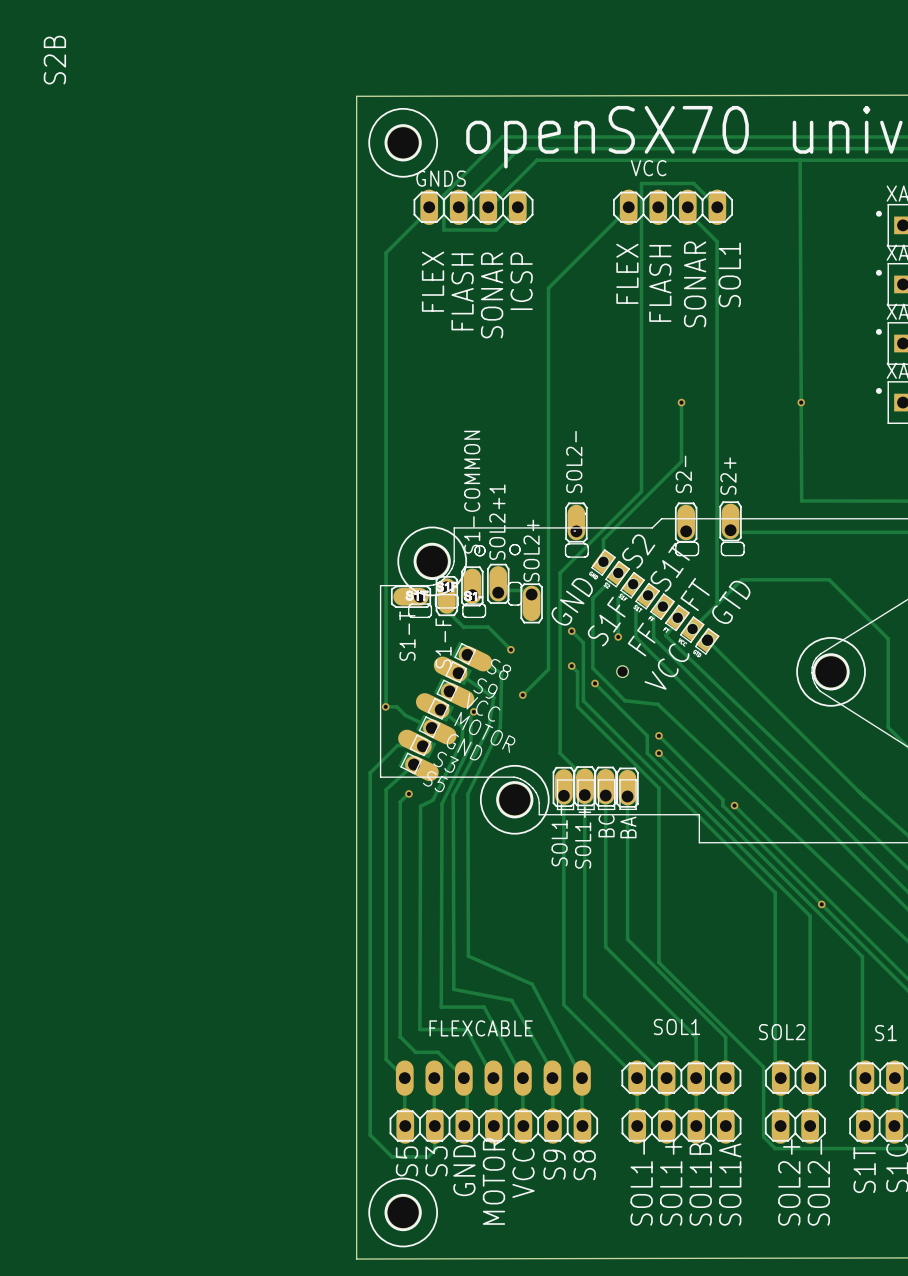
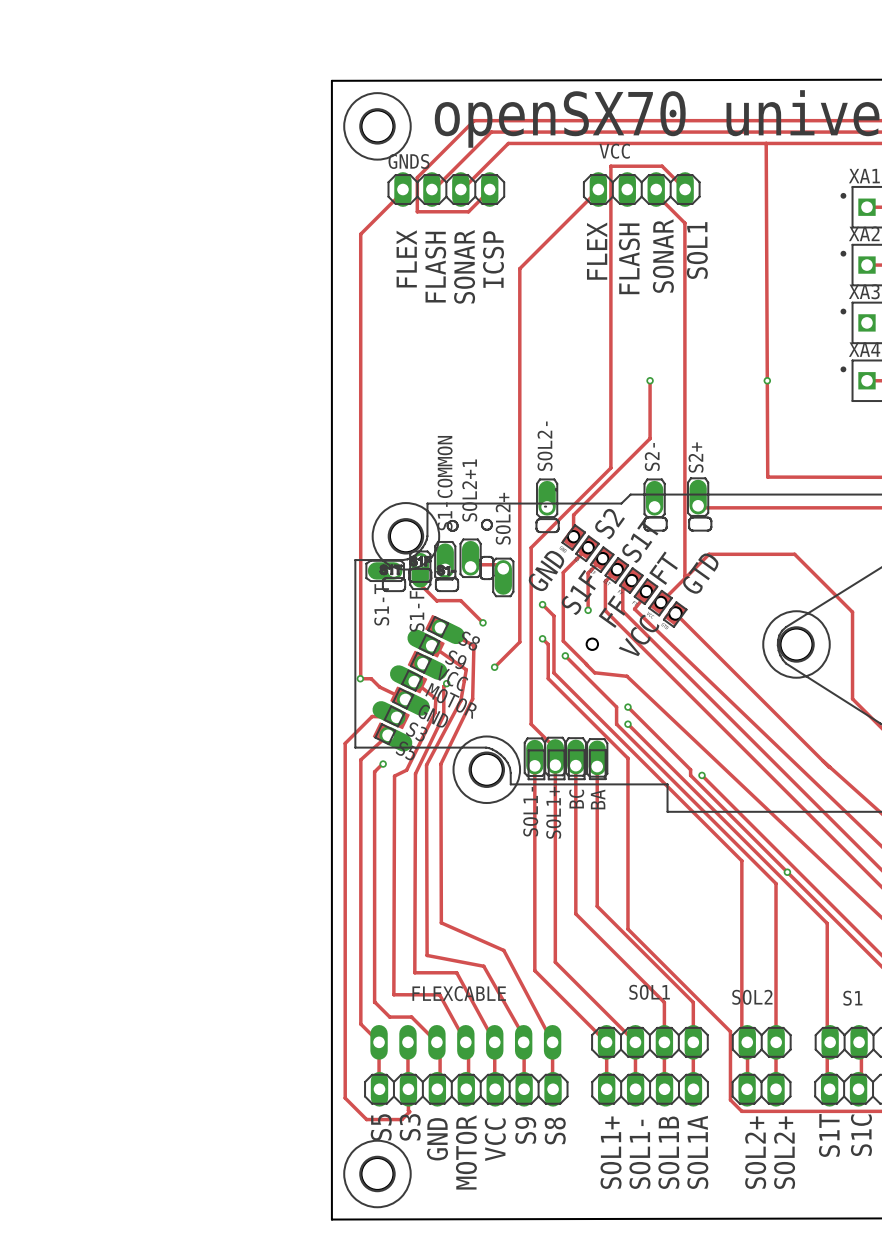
text: S2B (54, 60) -> none
text: SOL1- (641, 1182) -> SOL1+ (611, 1152)
text: SOL1+ (671, 1182) -> SOL1- (639, 1154)
text: SOL2- (818, 1182) -> SOL2+ (784, 1152)

